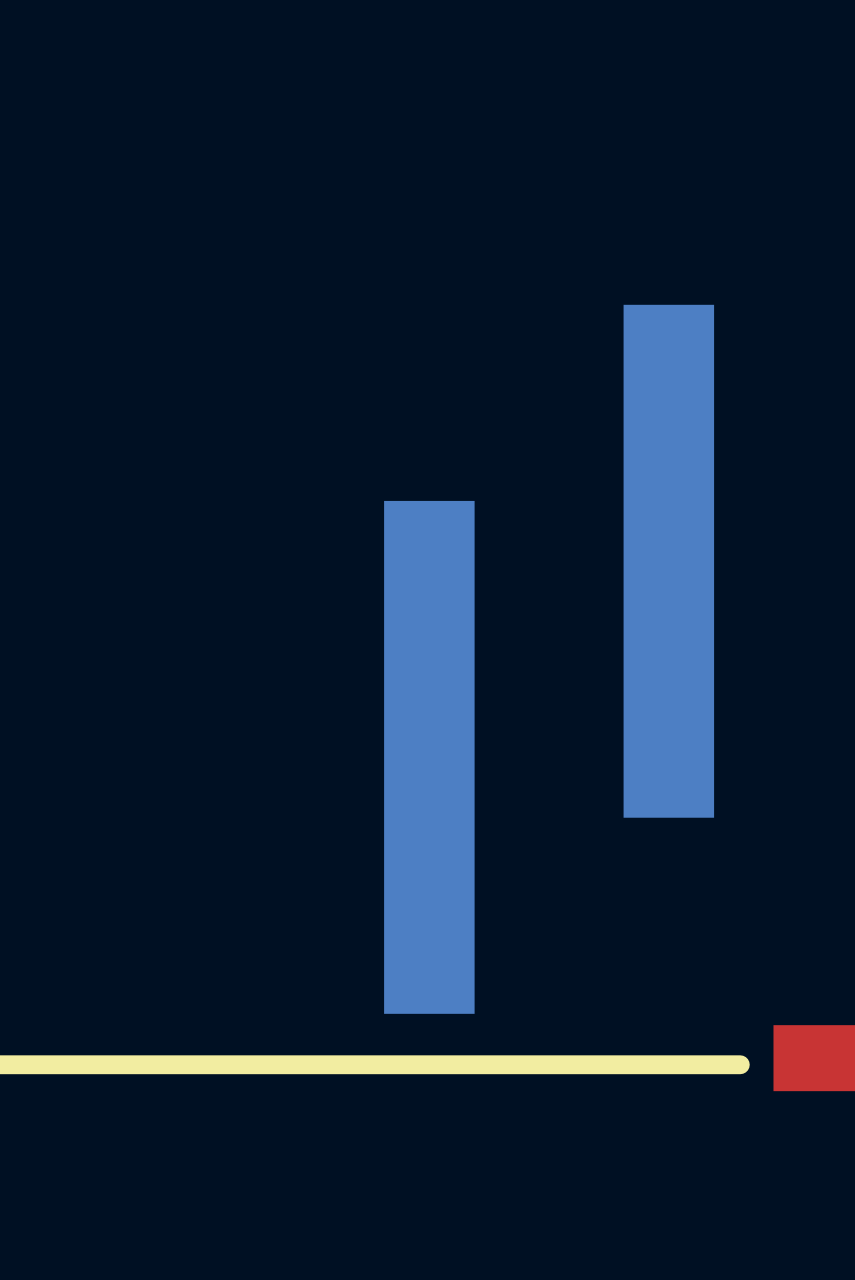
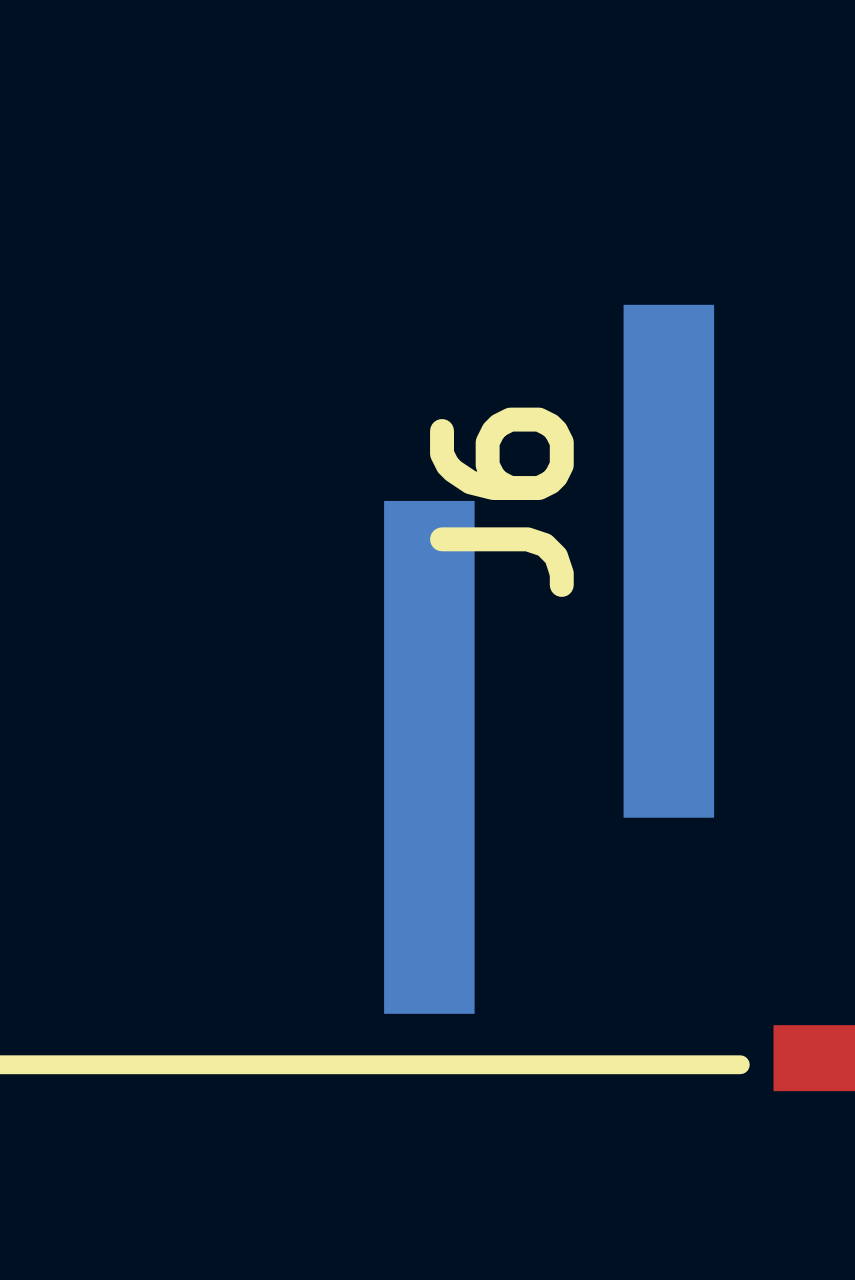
J6 name: none -> J6 (501, 502)

